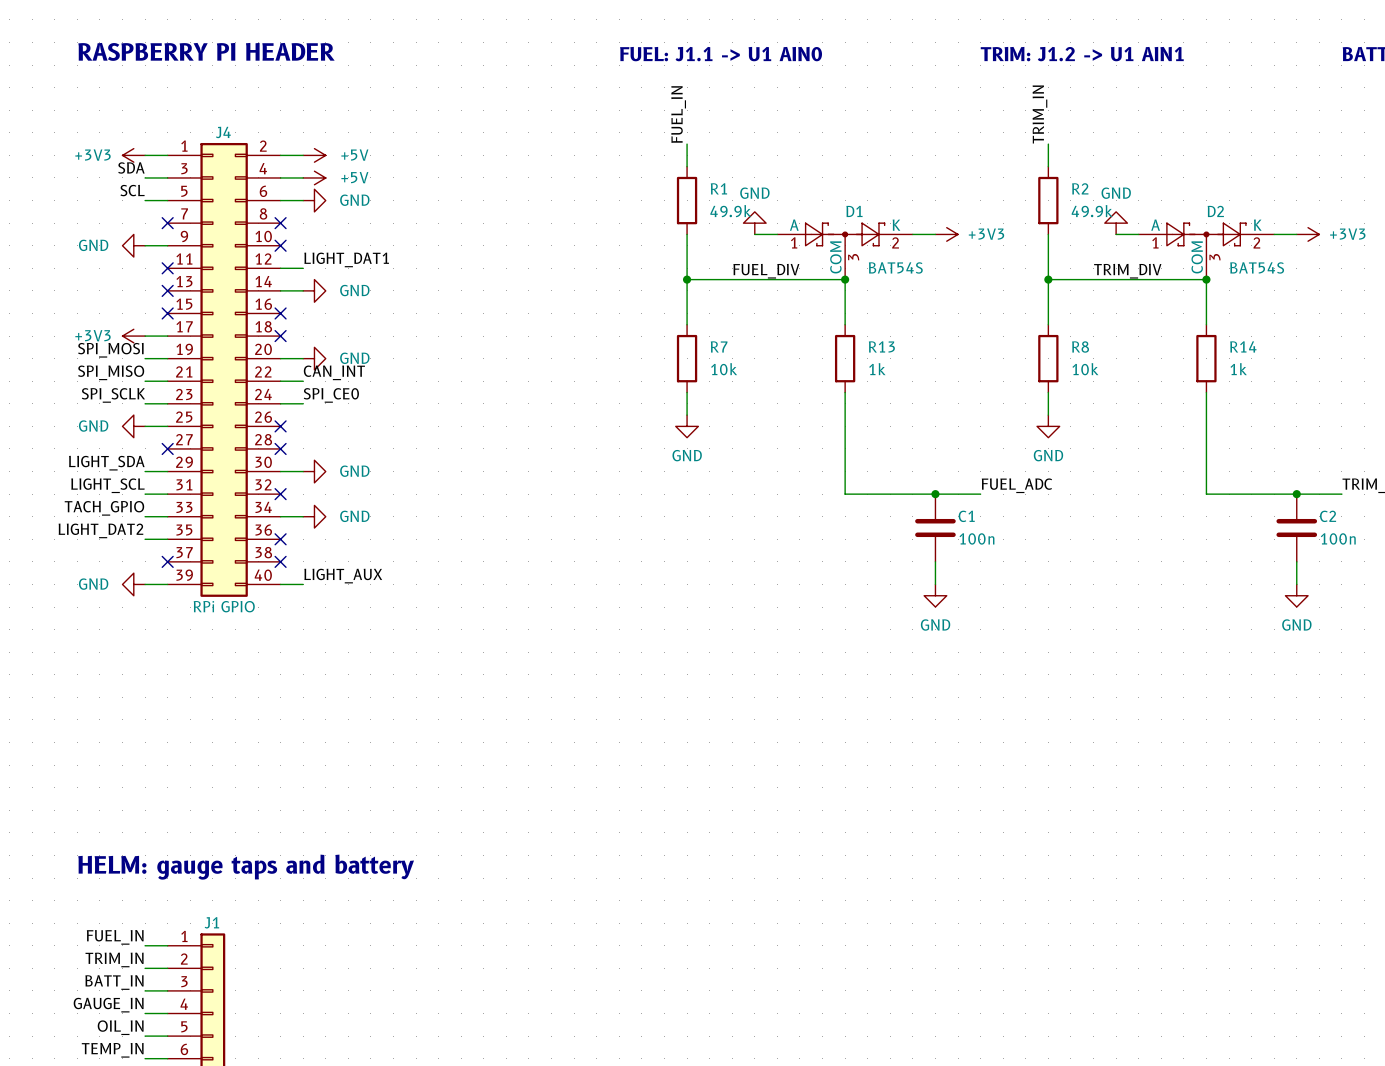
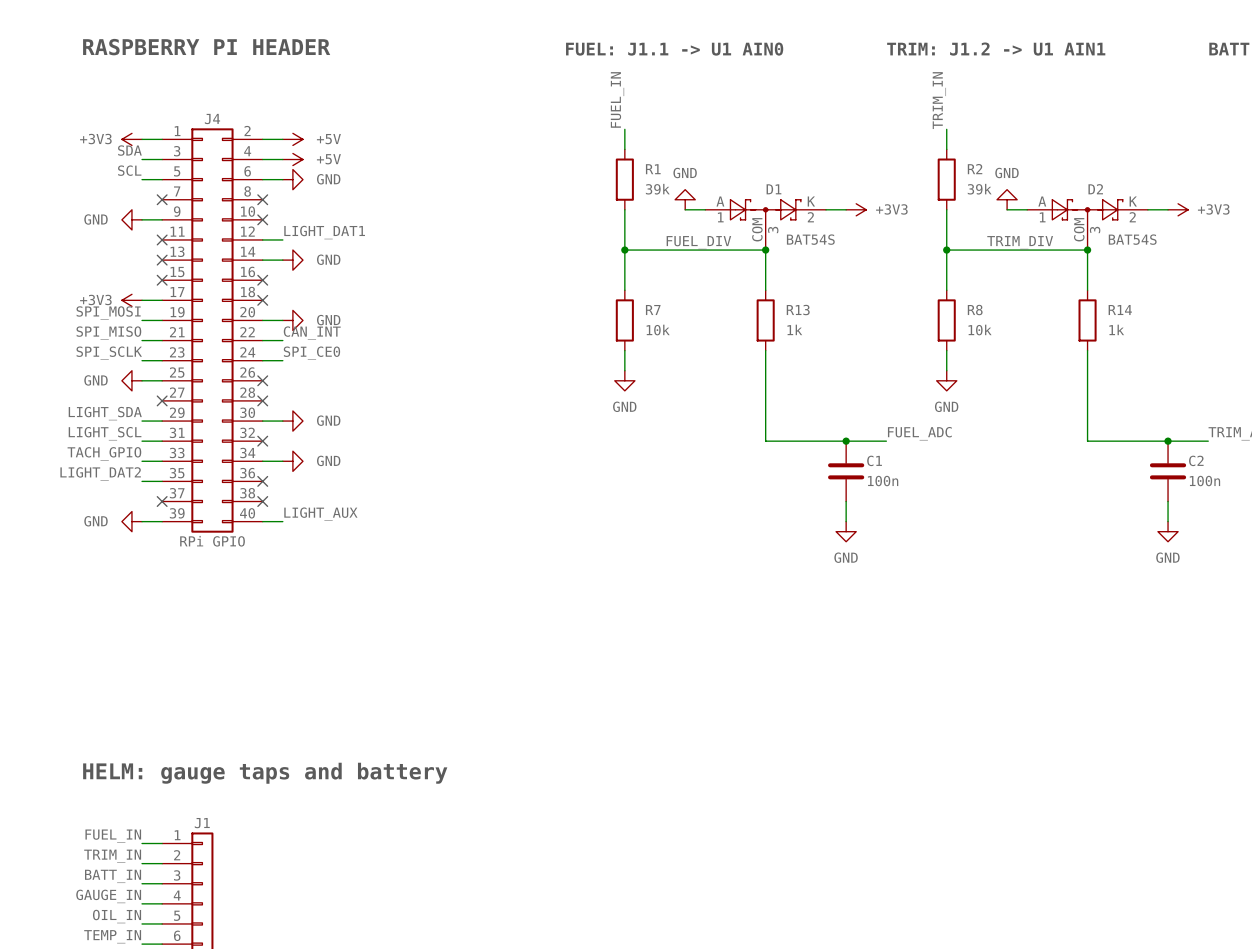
R1 value: 49.9k (730, 211) -> 39k (657, 189)
R2 value: 49.9k (1092, 211) -> 39k (979, 189)

